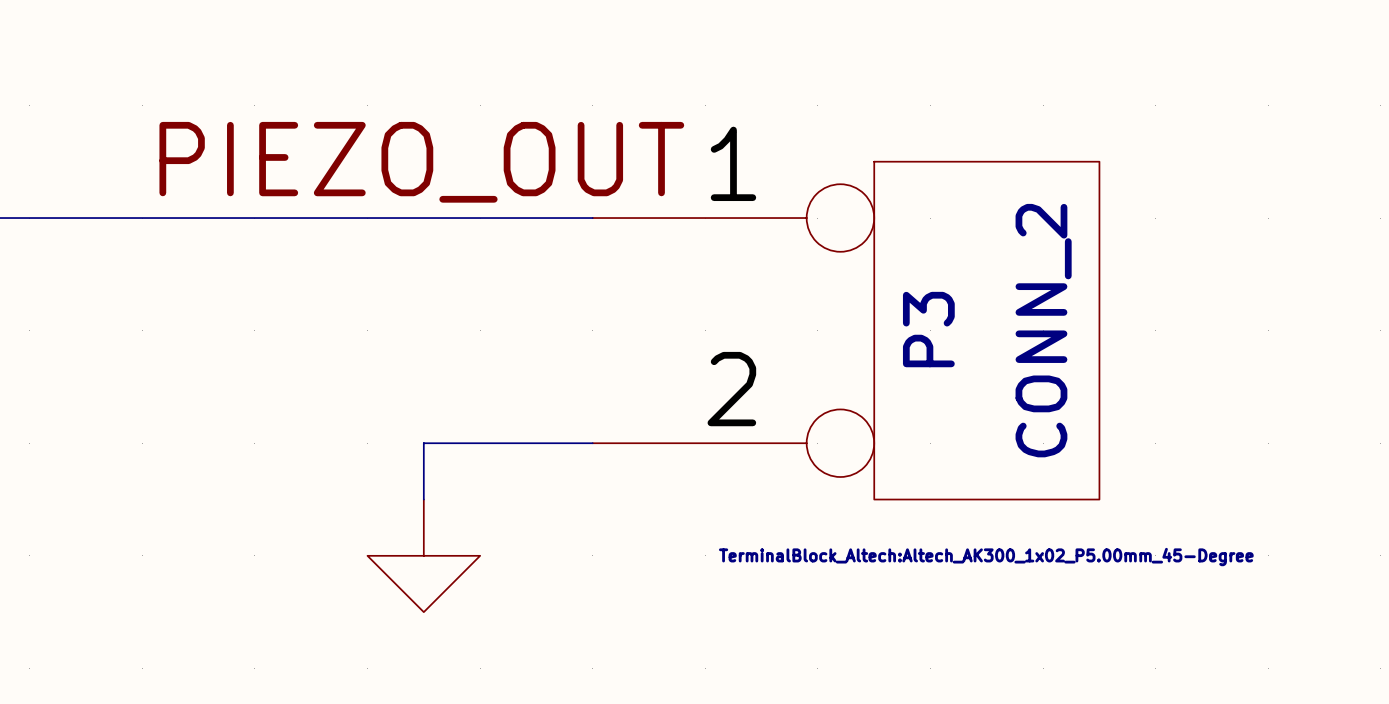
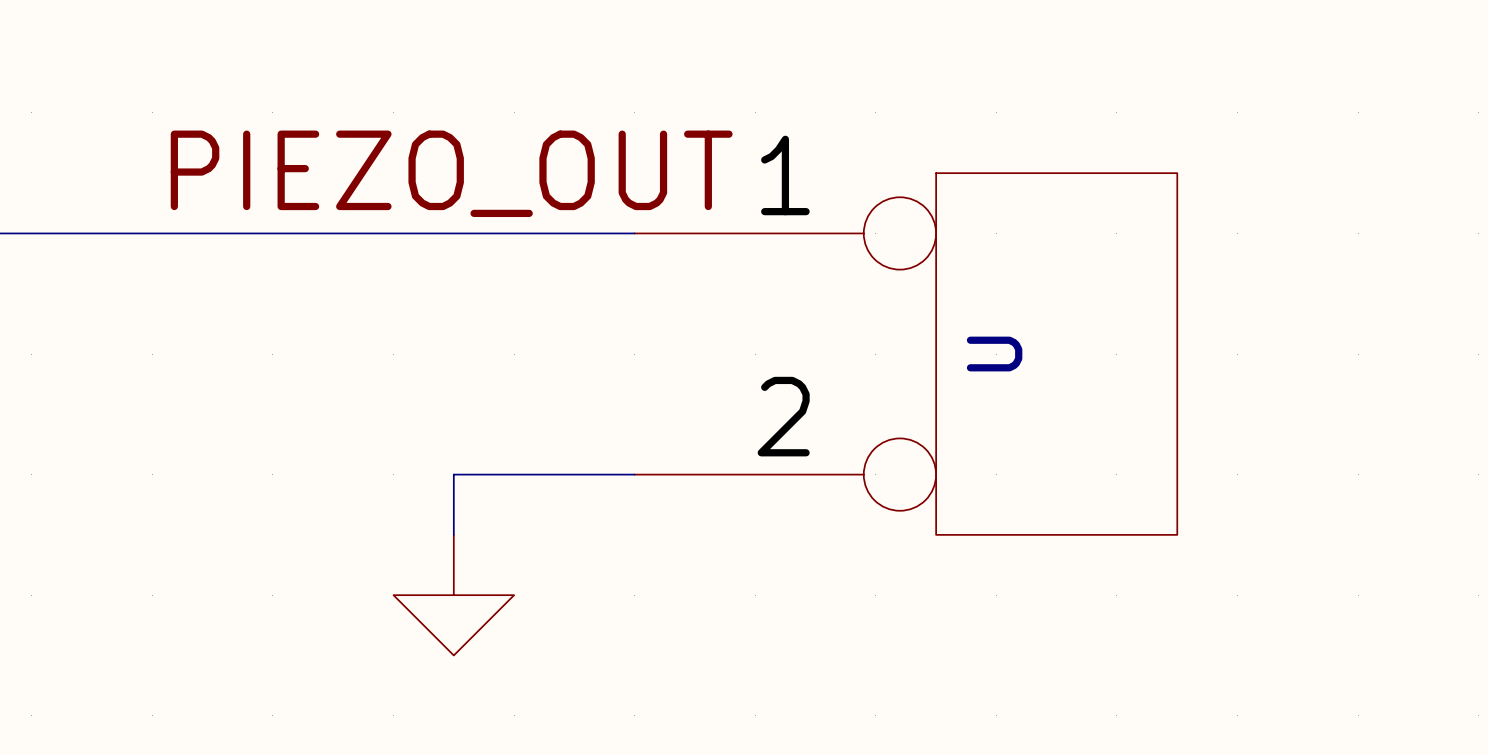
P3 name: P3 (928, 329) -> U (994, 354)
P3 value: CONN_2 (1043, 330) -> none
P3 text: TerminalBlock_Altech:Altech_AK300_1x02_P5.00mm_45-Degree (986, 557) -> none

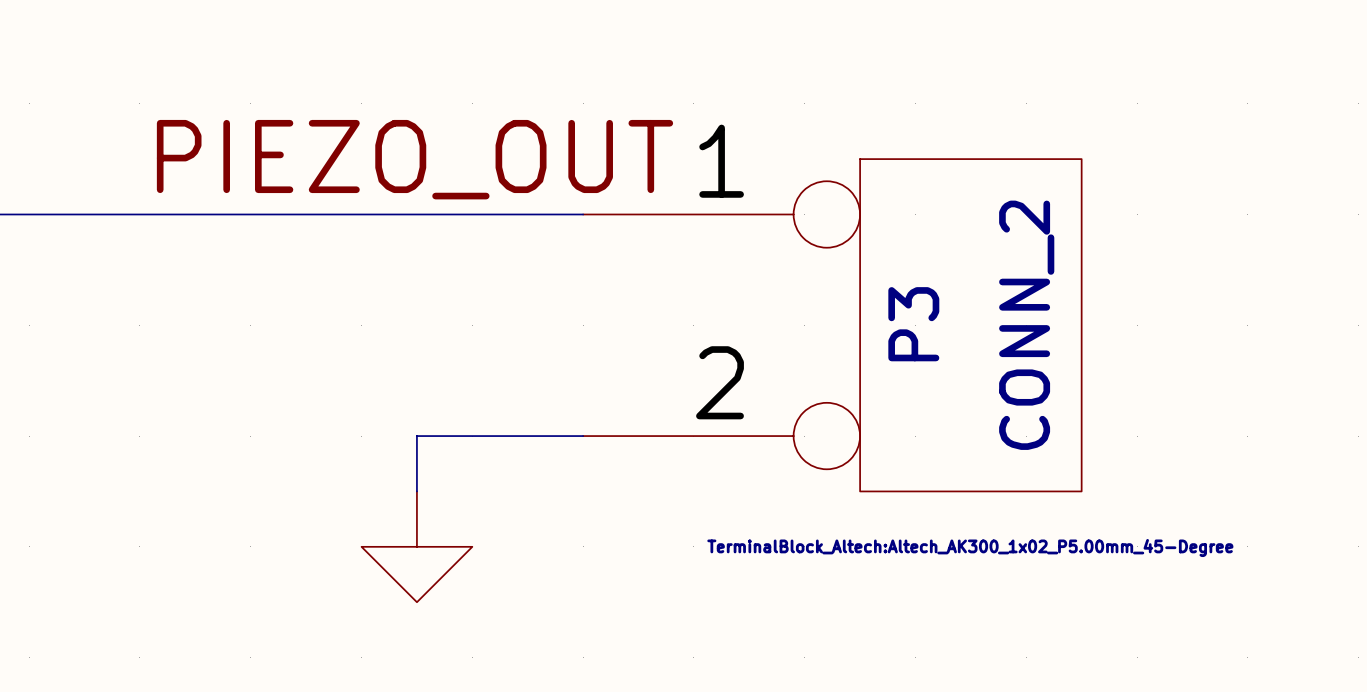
U name: U (994, 354) -> P3 (913, 324)
U value: none -> CONN_2 (1026, 325)
U text: none -> TerminalBlock_Altech:Altech_AK300_1x02_P5.00mm_45-Degree (970, 548)

